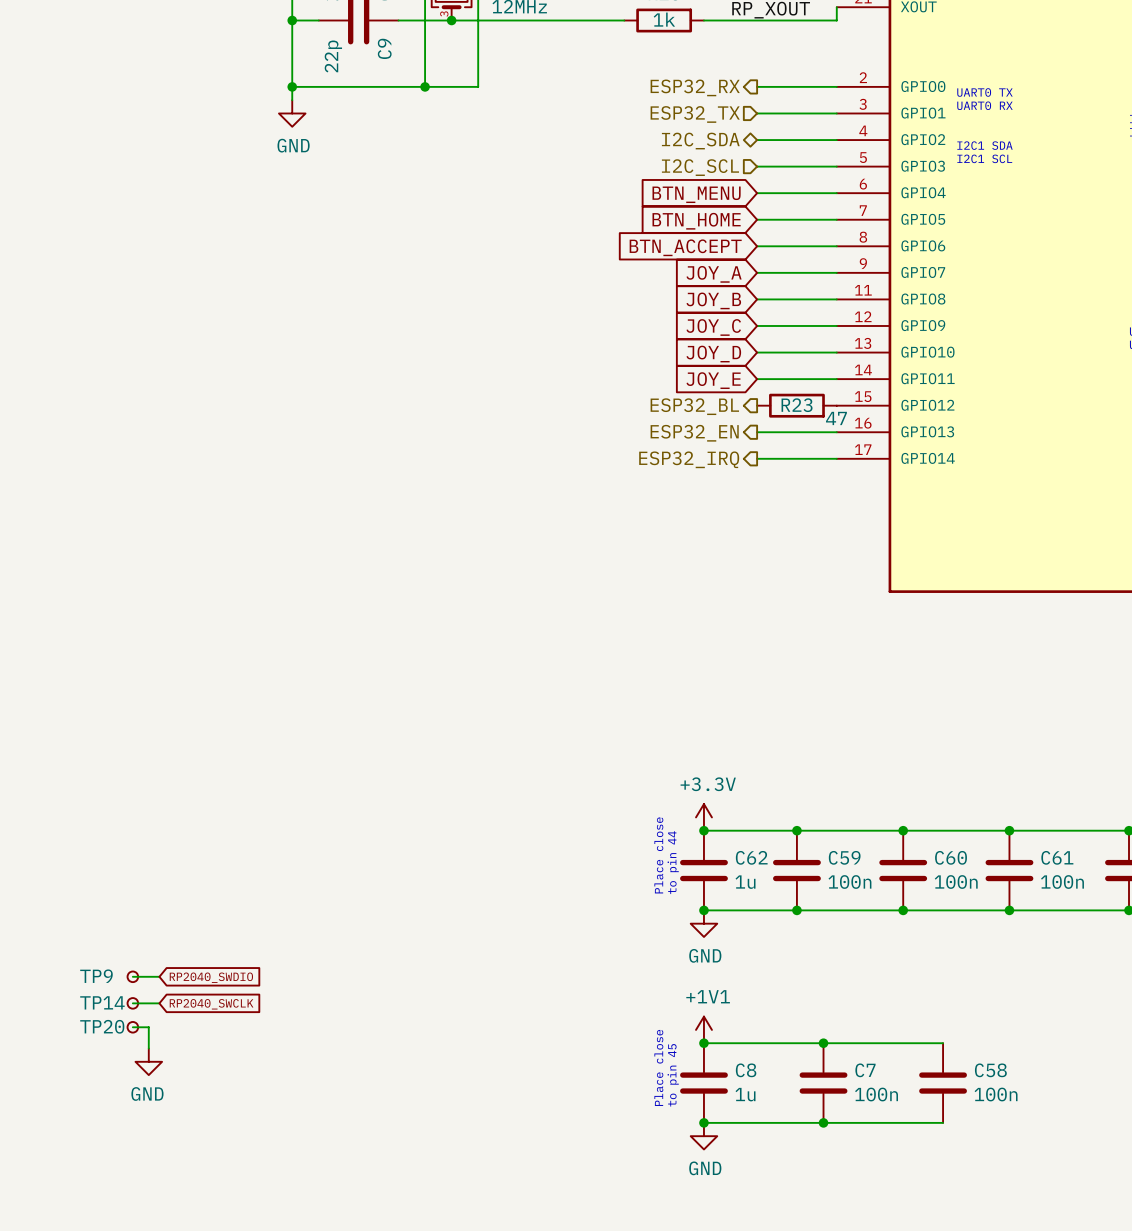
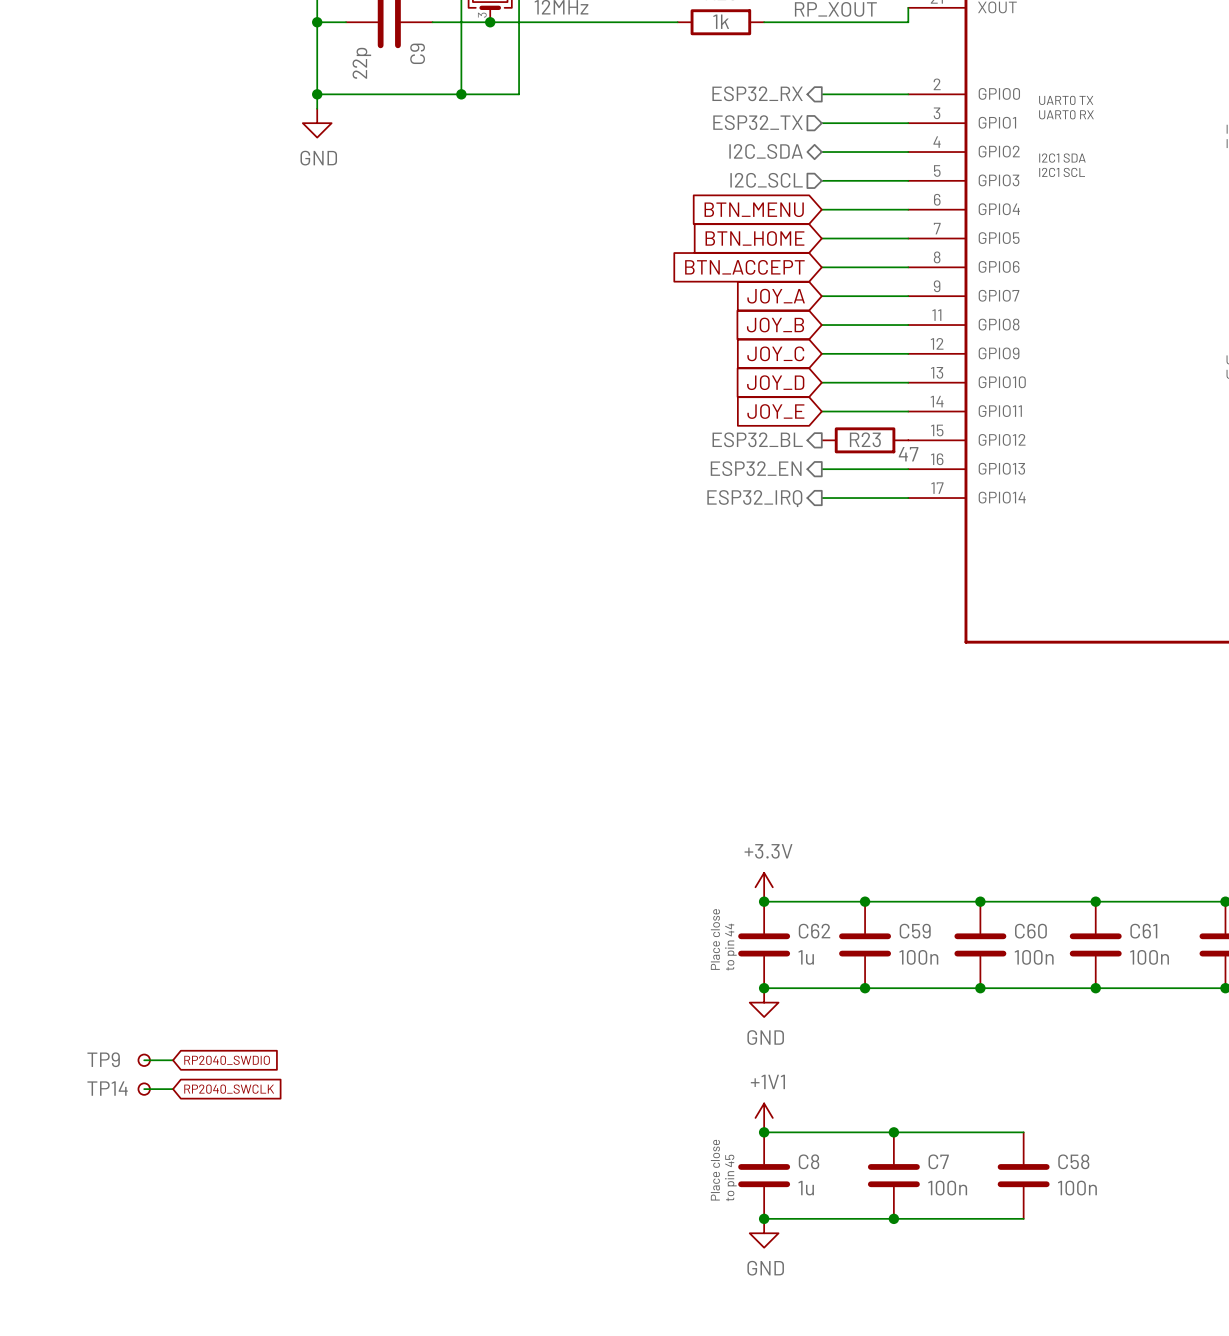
wire: (132, 1027) (148, 1027) (148, 1048) -> none
TP20: (132, 1027) -> none
power symbol: GND (148, 1061) -> none

